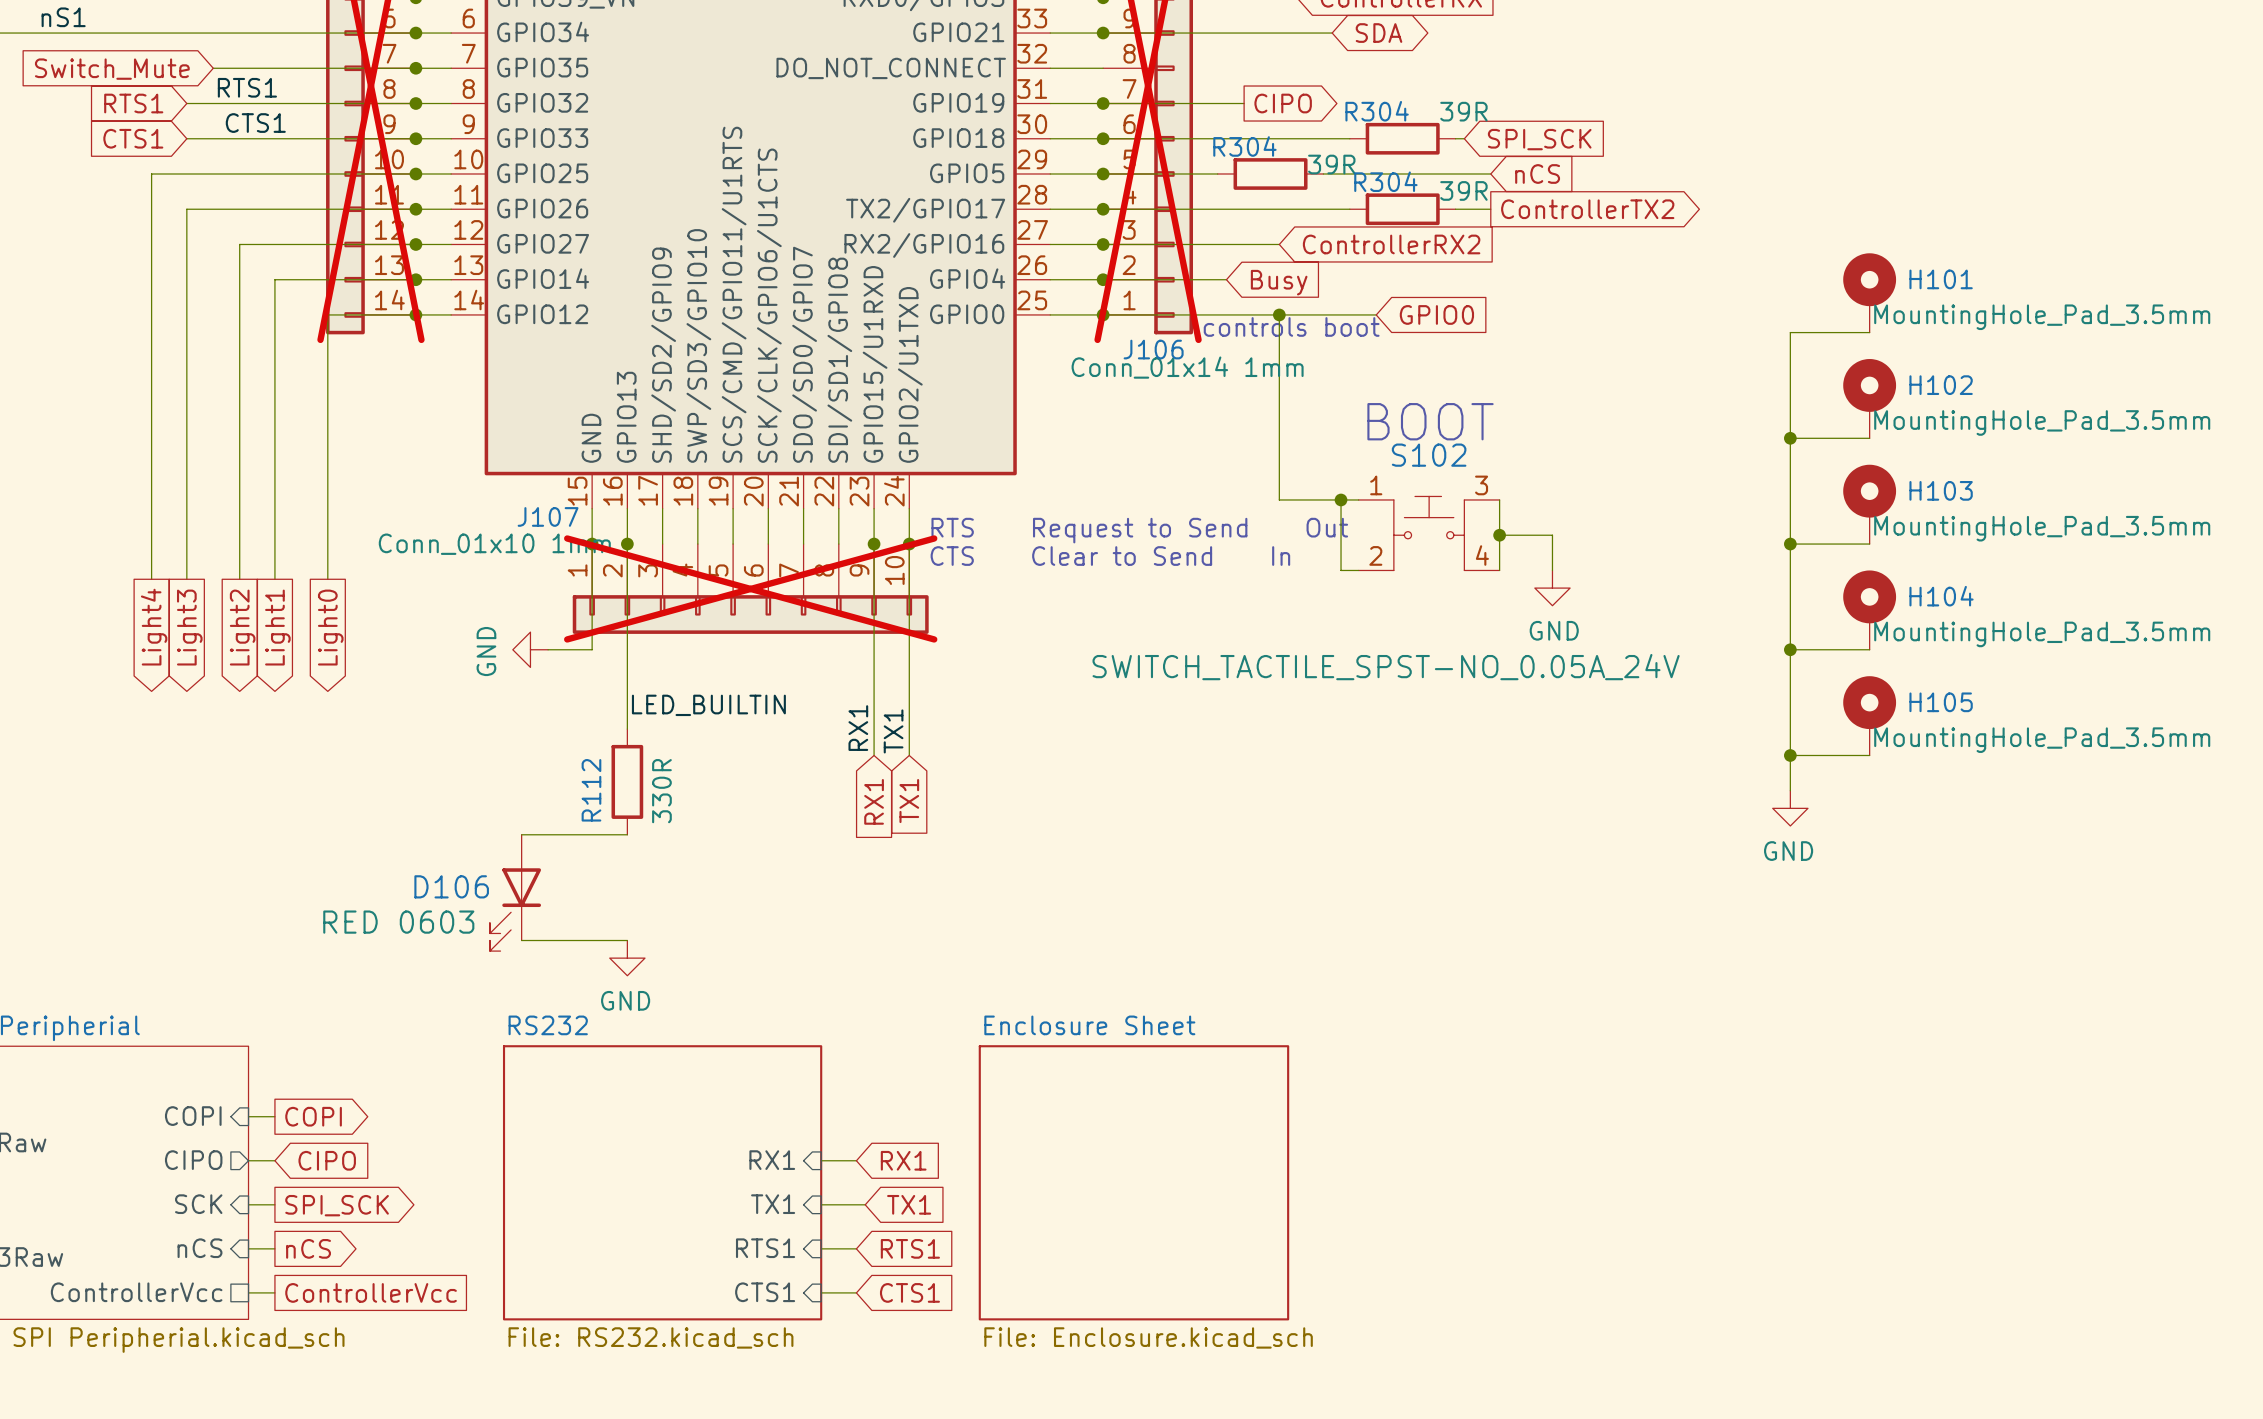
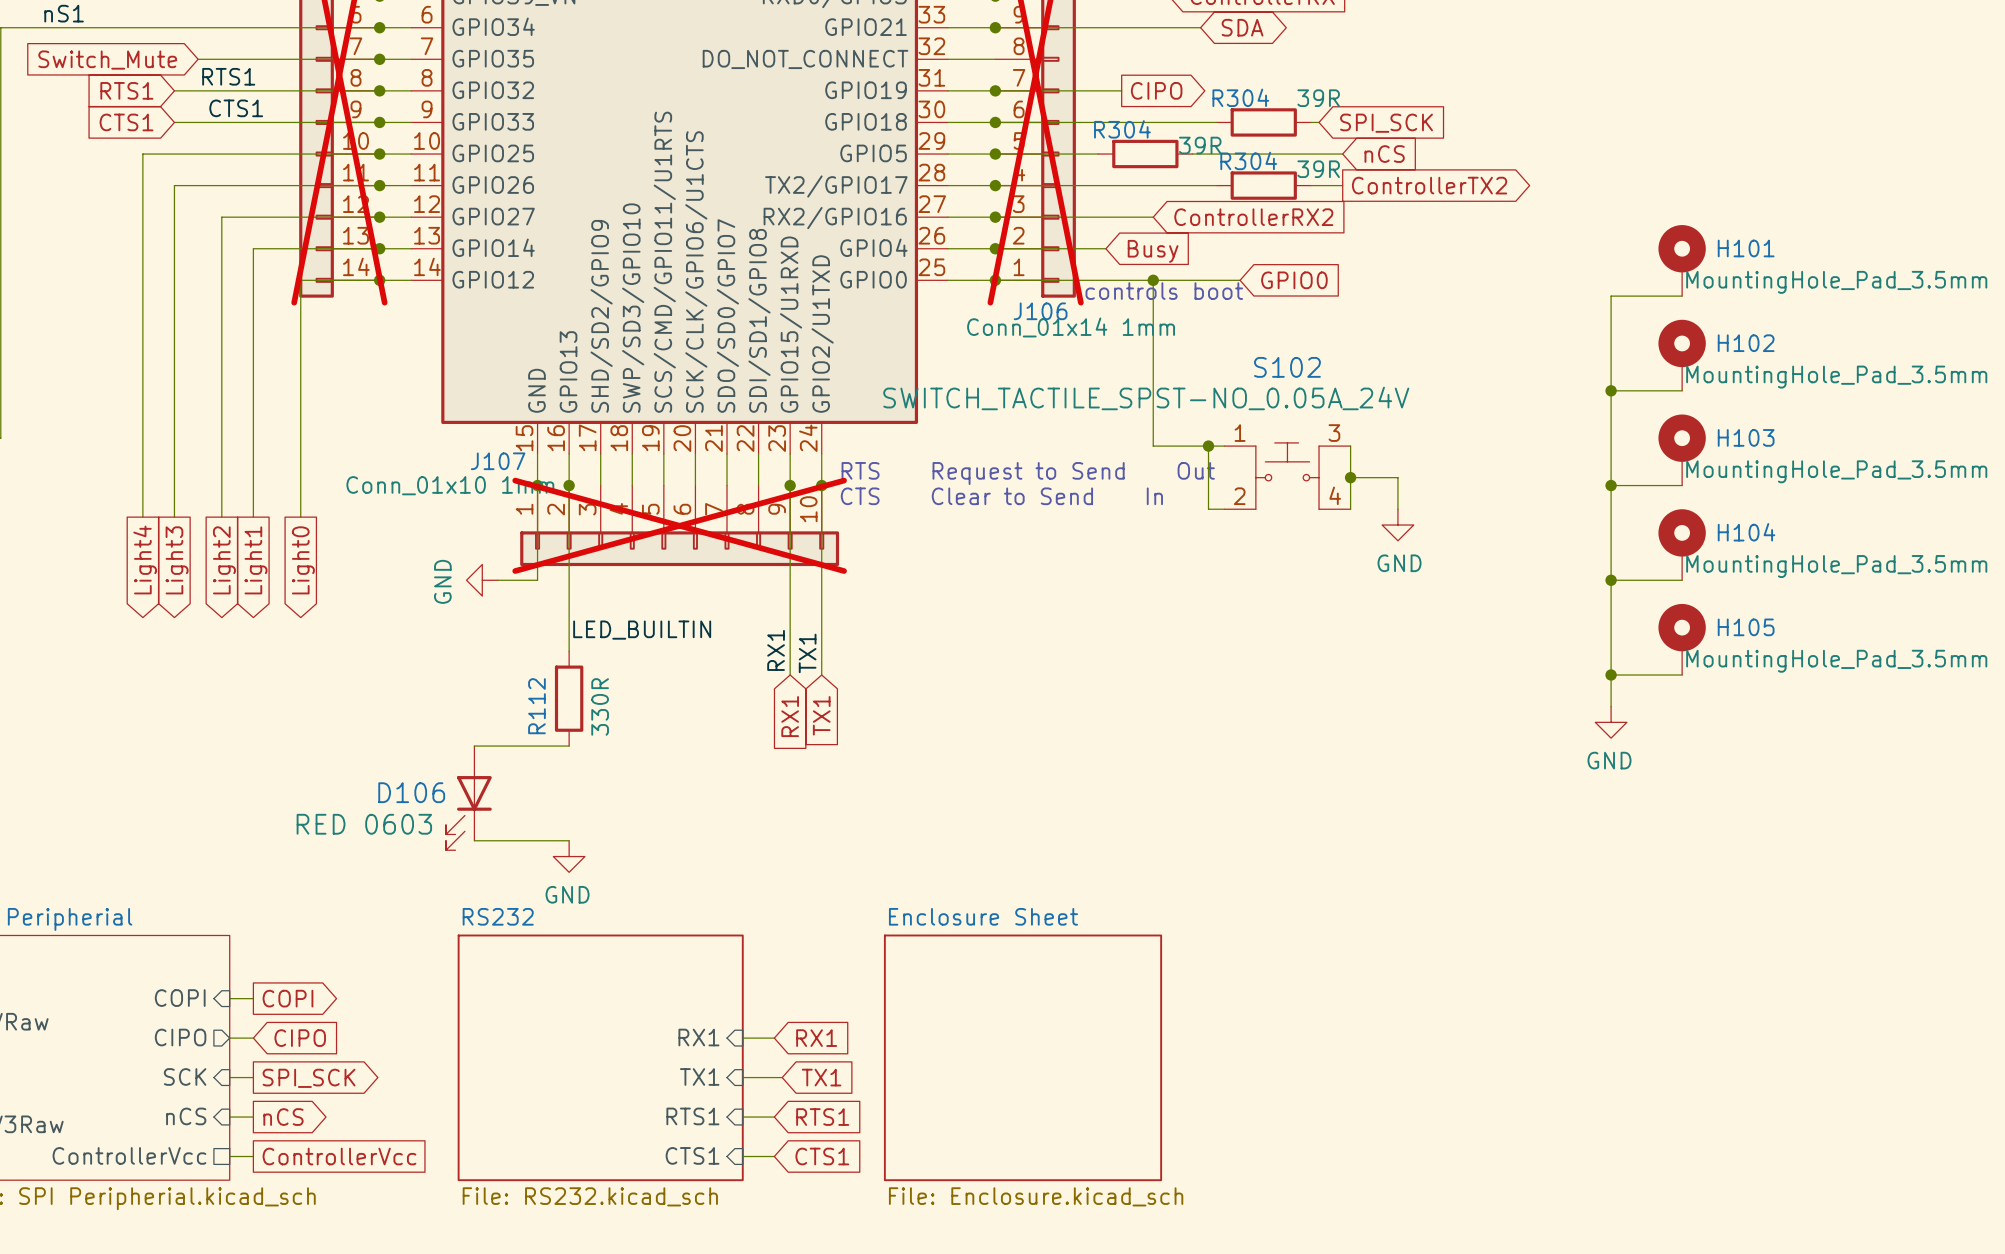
text: BOOT (1430, 421) -> none
S102 name position: S102 (1429, 455) -> S102 (1287, 367)
S102 value position: SWITCH_TACTILE_SPST-NO_0.05A_24V (1386, 667) -> SWITCH_TACTILE_SPST-NO_0.05A_24V (1146, 398)

